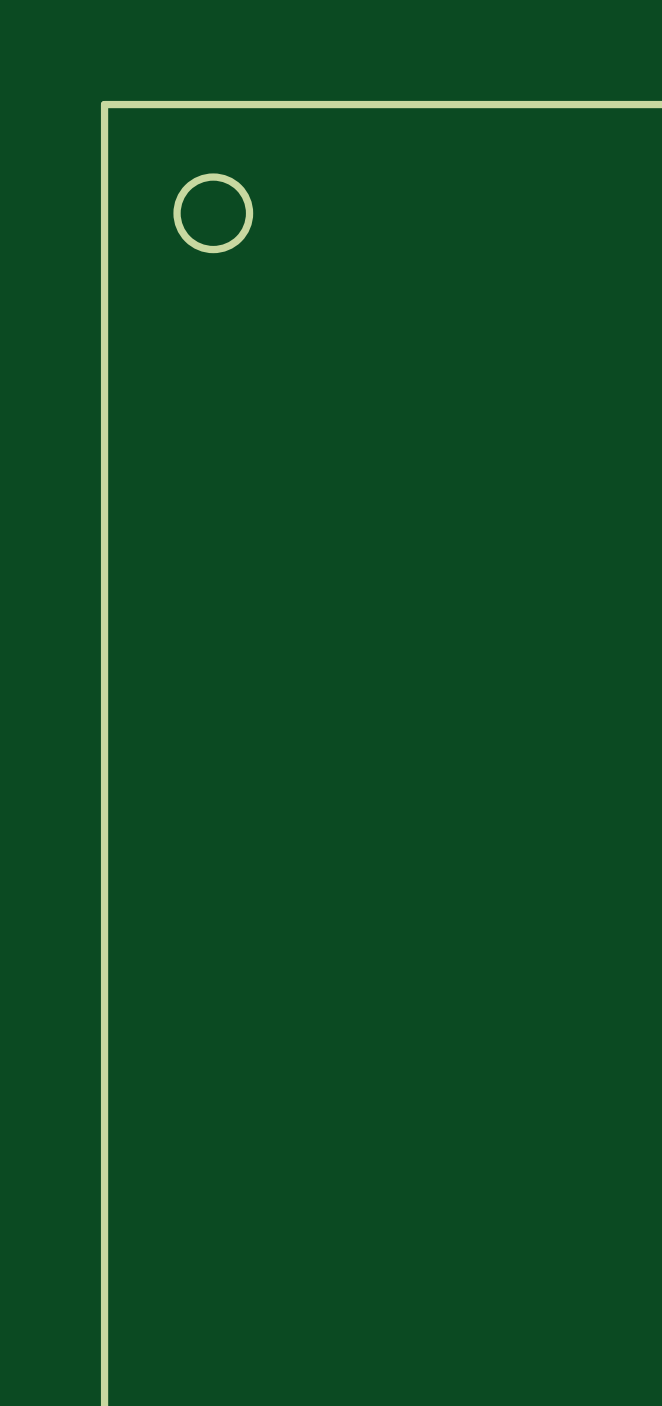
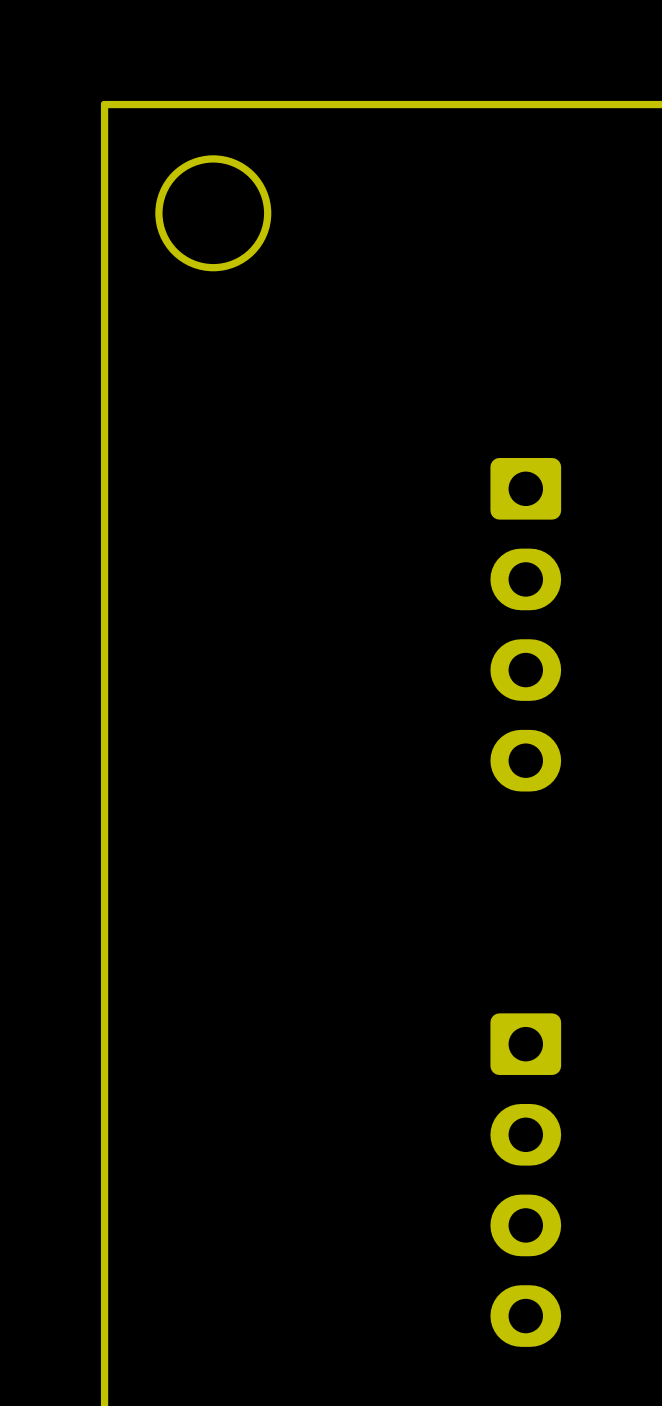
round board edge size: [173, 173, 254, 254] -> [155, 155, 272, 272]
part: none -> (525, 624)
part: none -> (525, 1180)

